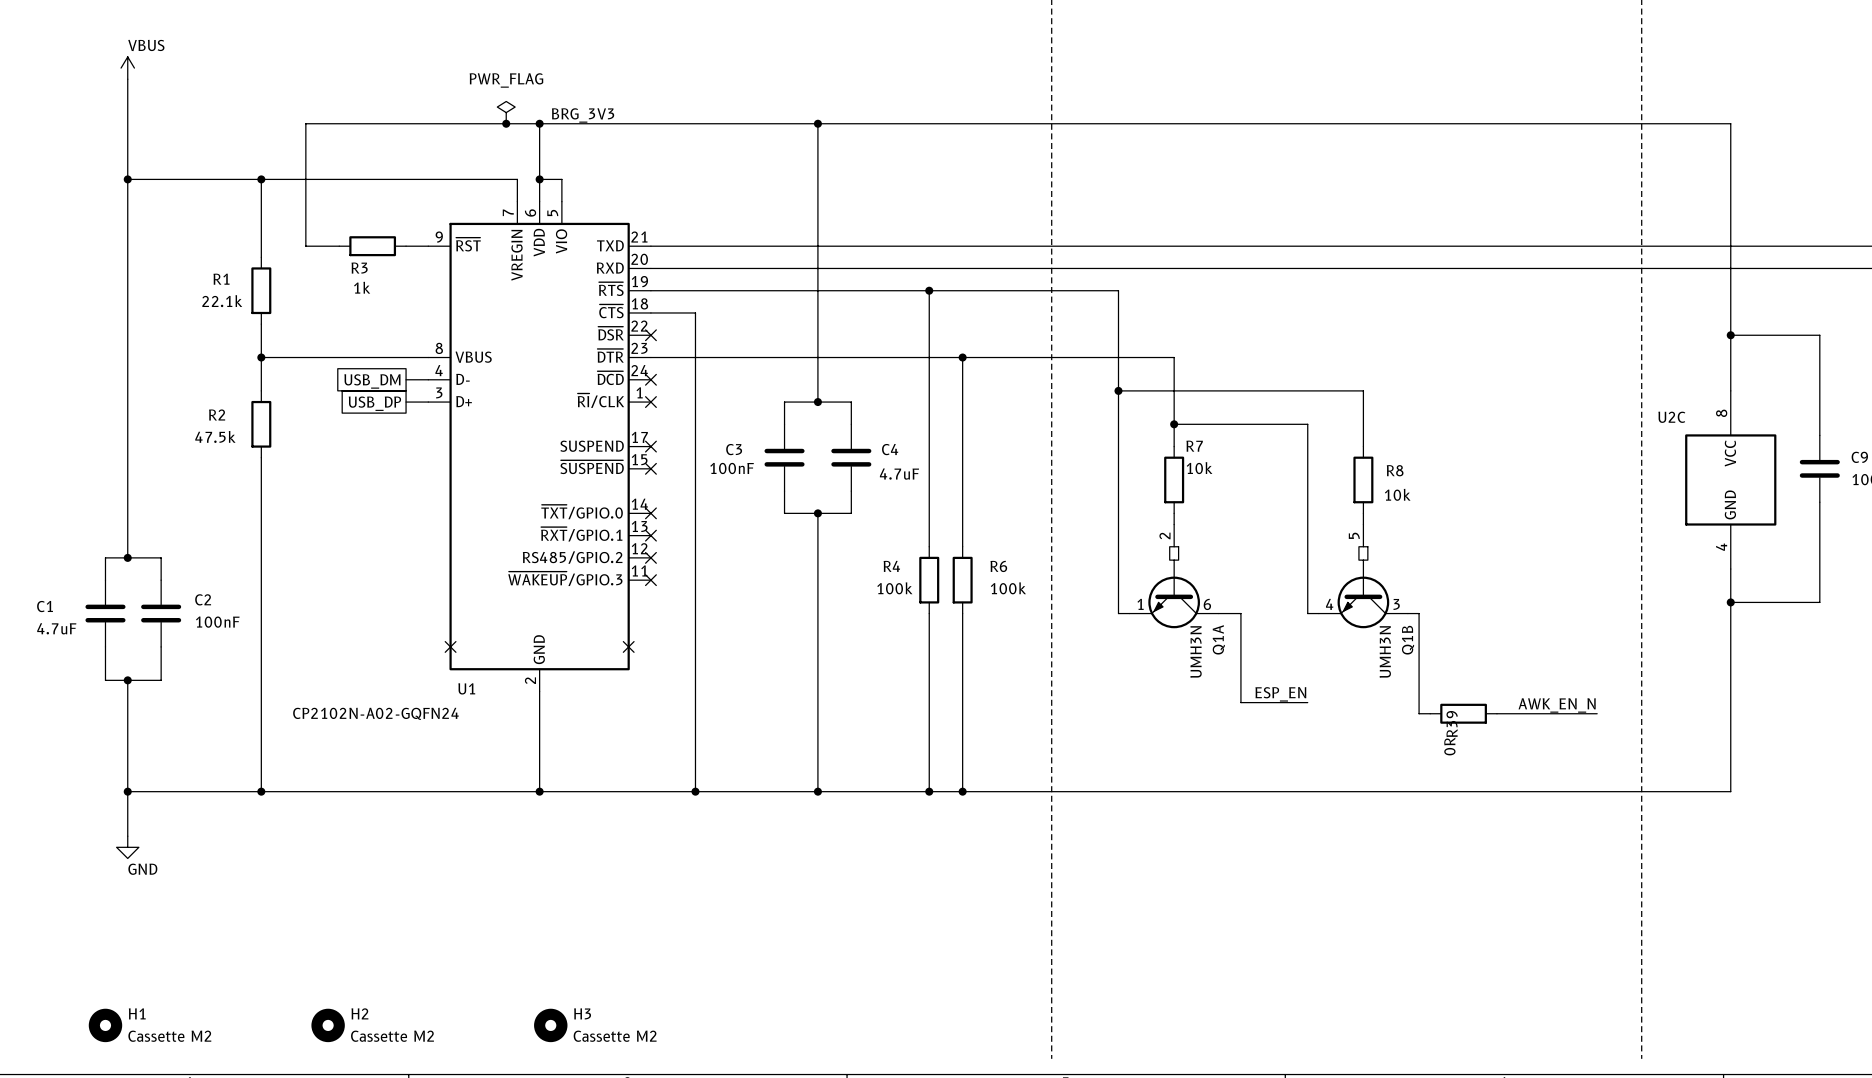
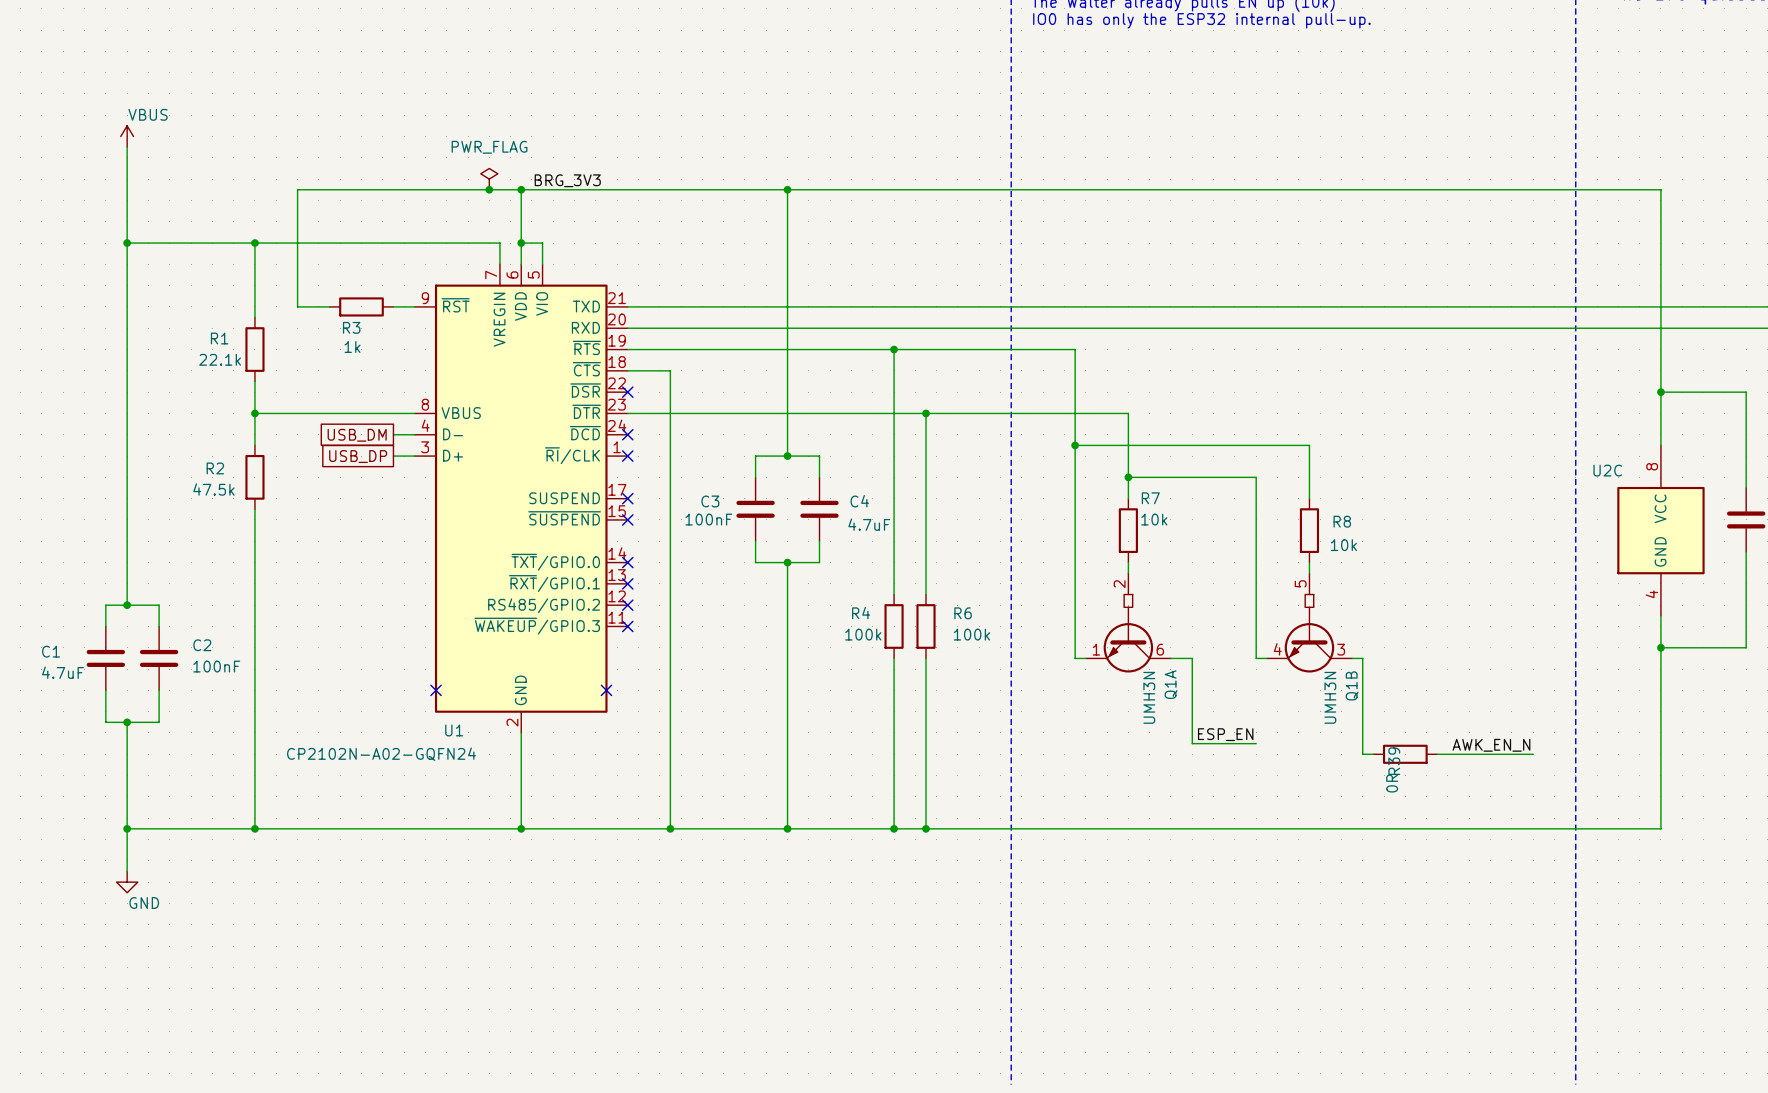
H1: Cassette M2 (105, 1025) -> none
H2: Cassette M2 (328, 1025) -> none
H3: Cassette M2 (550, 1025) -> none

